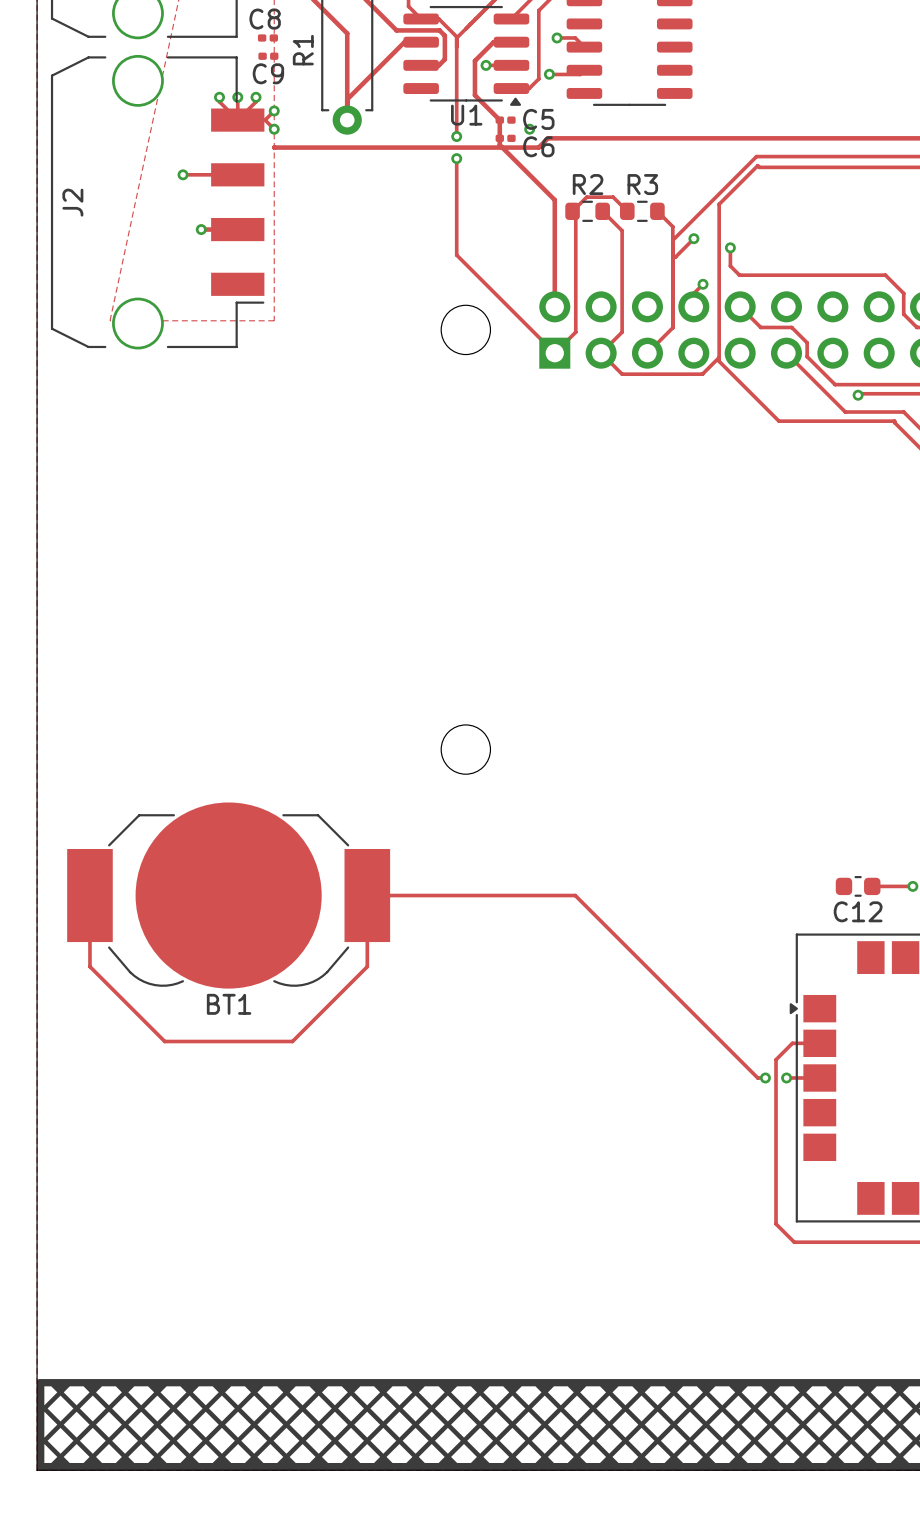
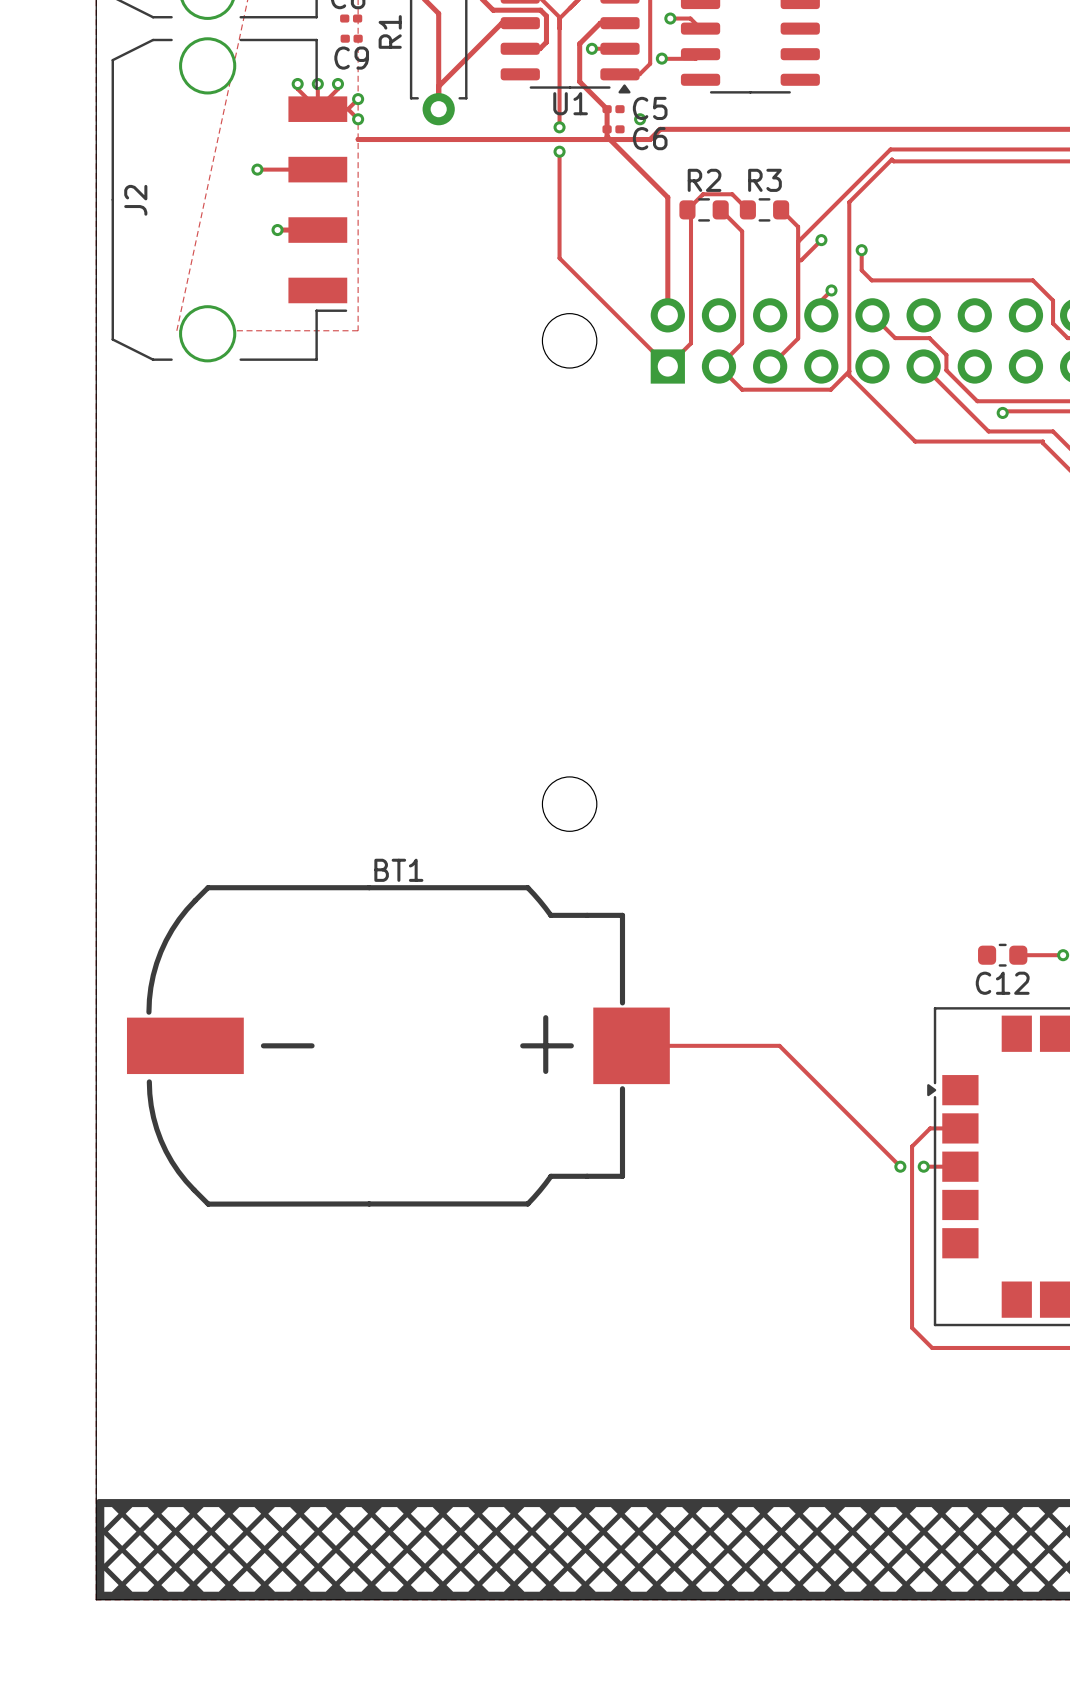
BT1 footprint: [67, 802, 391, 989] -> [126, 885, 670, 1207]
track: (89, 895) (89, 966) (164, 1041) (292, 1041) (367, 966) (367, 895) (575, 895) (757, 1077) (765, 1077) -> (631, 1045) (779, 1045) (900, 1166)
BT1 name position: BT1 (229, 1004) -> BT1 (398, 870)

